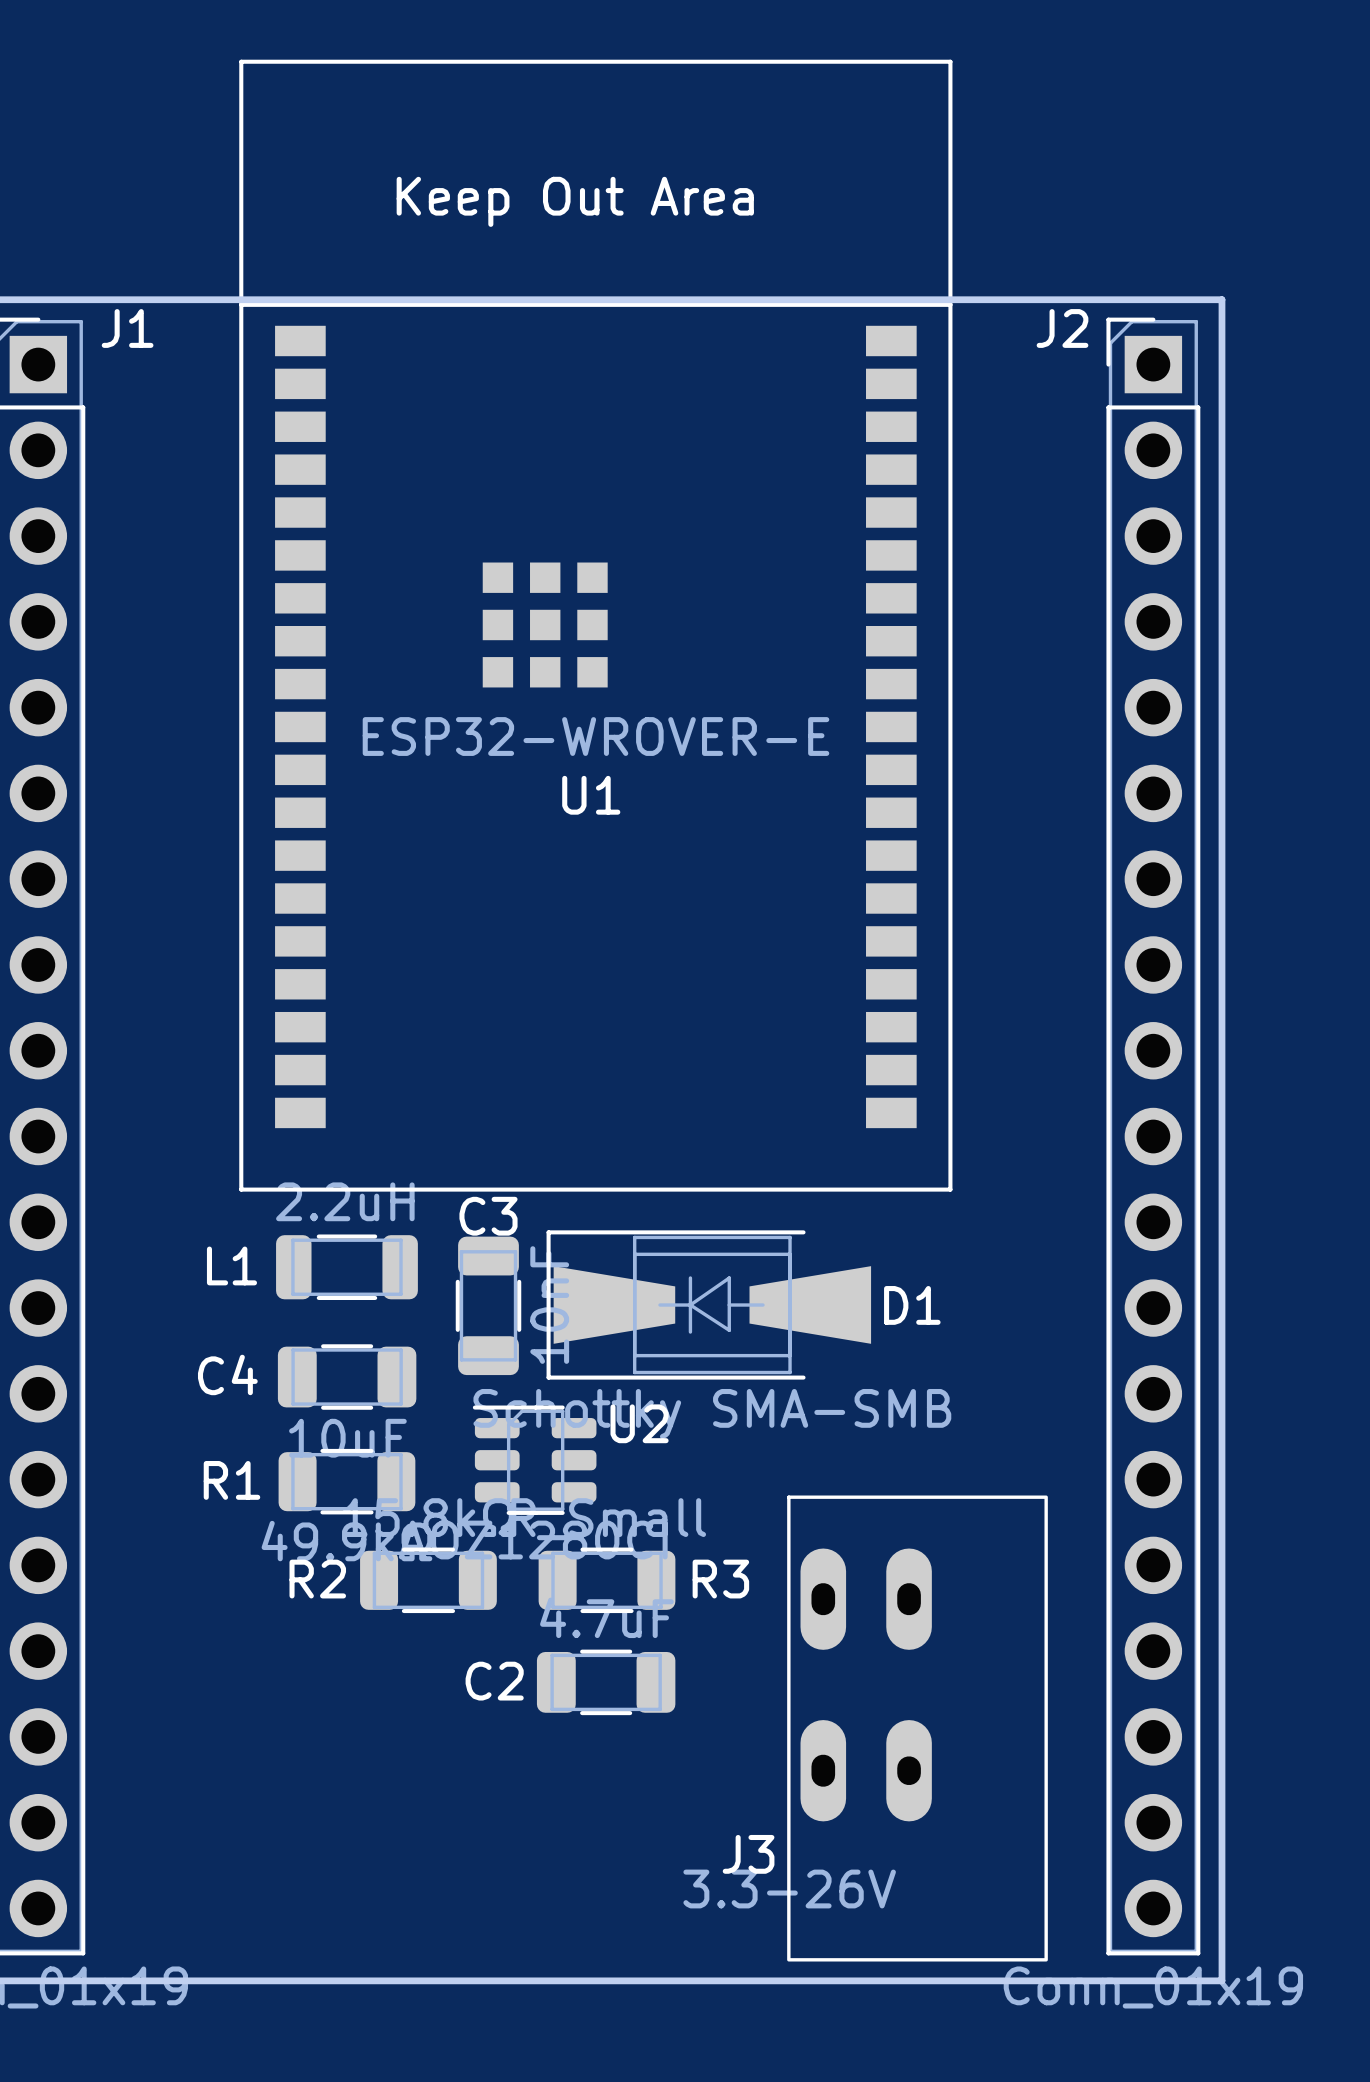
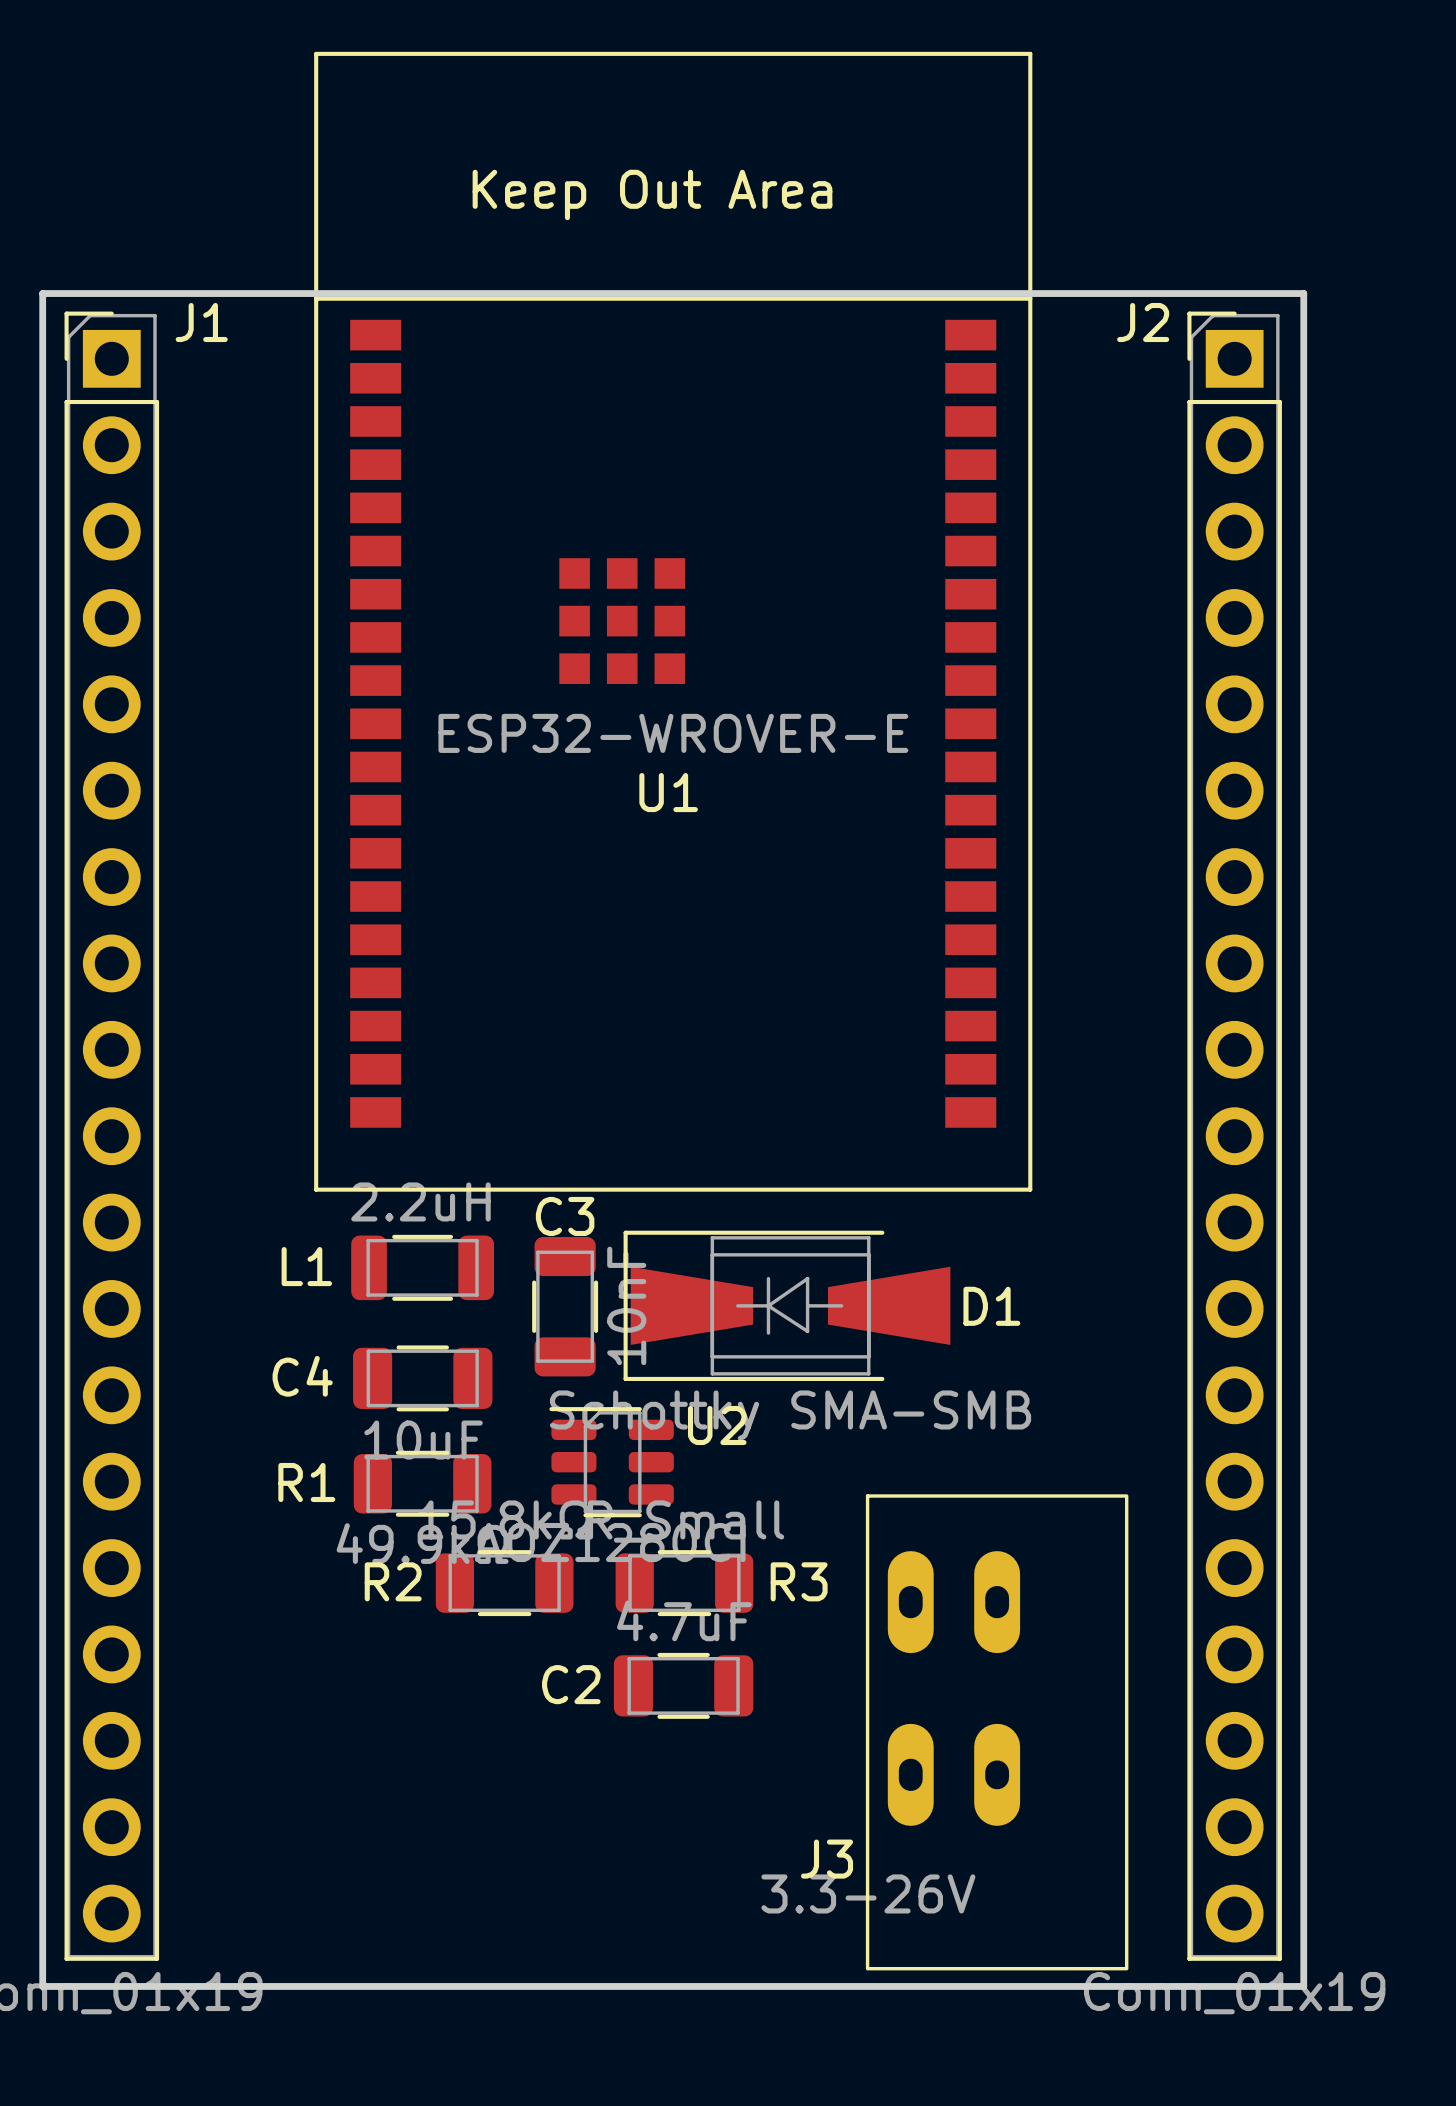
J3 footprint: [787, 1495, 1048, 1962] -> [865, 1494, 1129, 1971]

